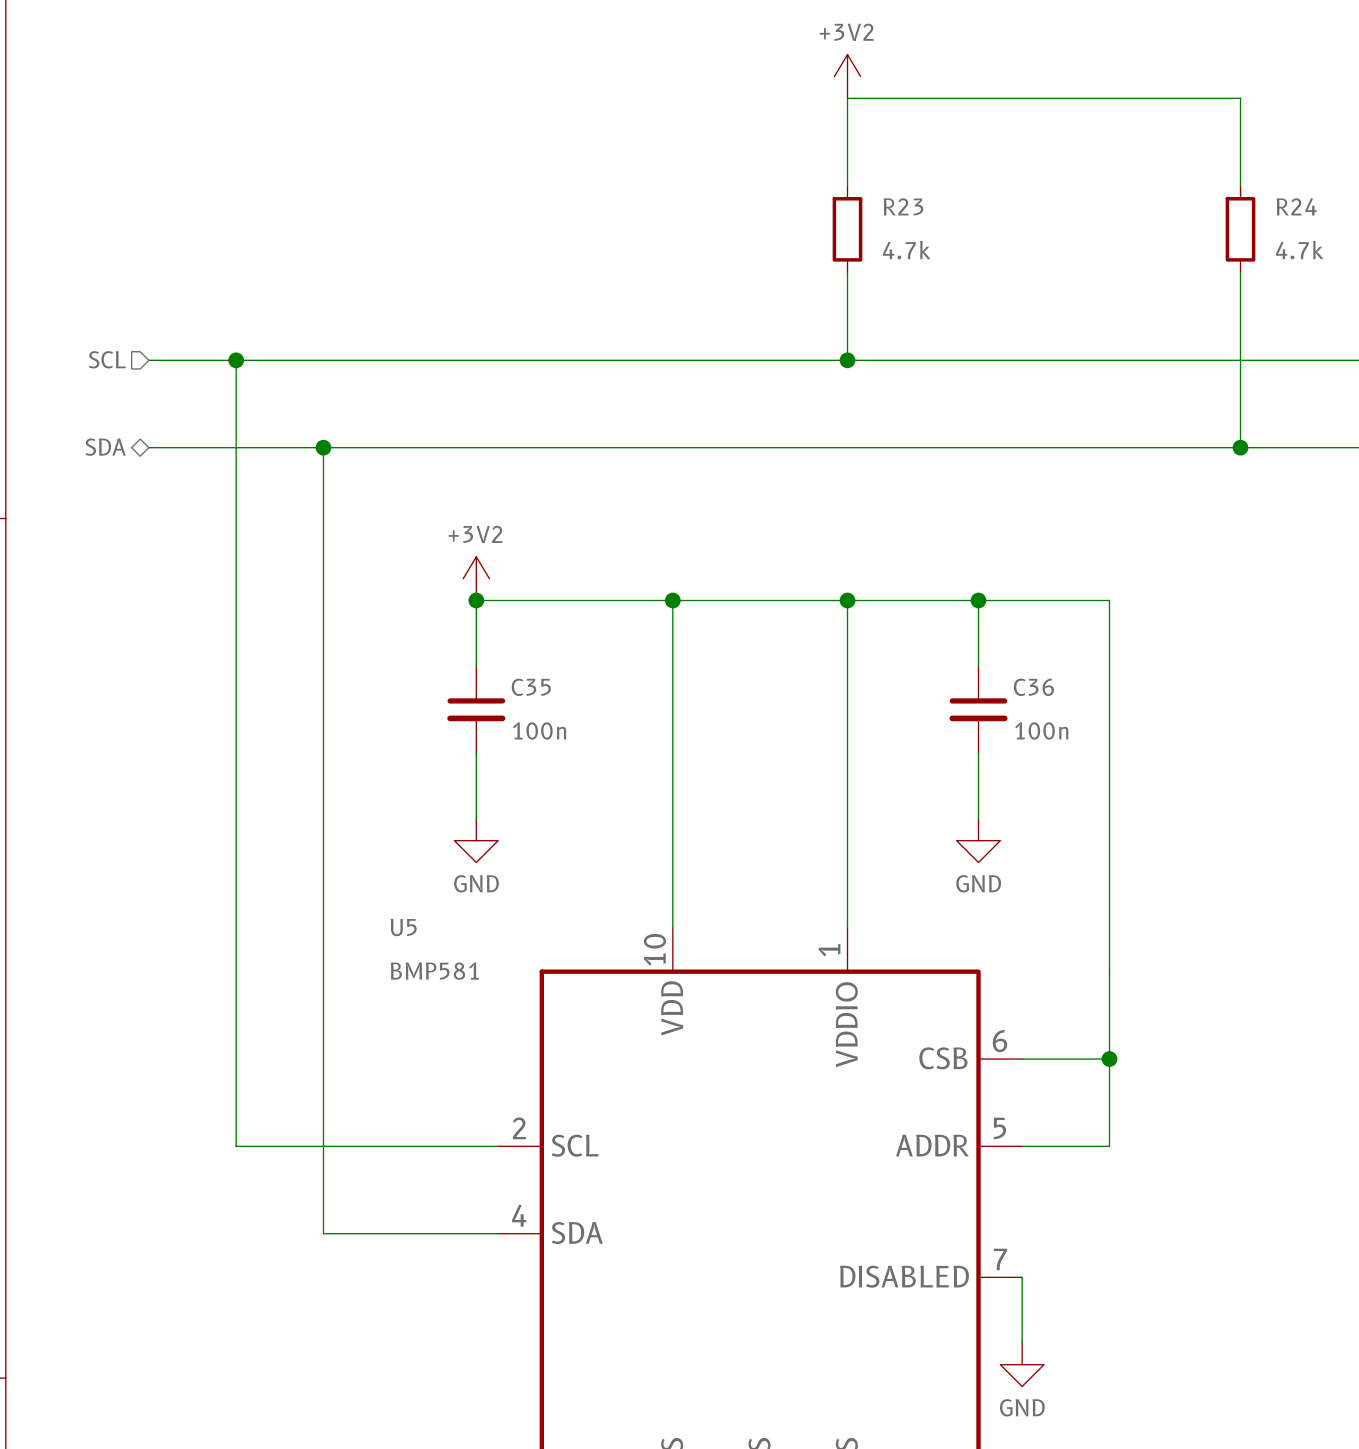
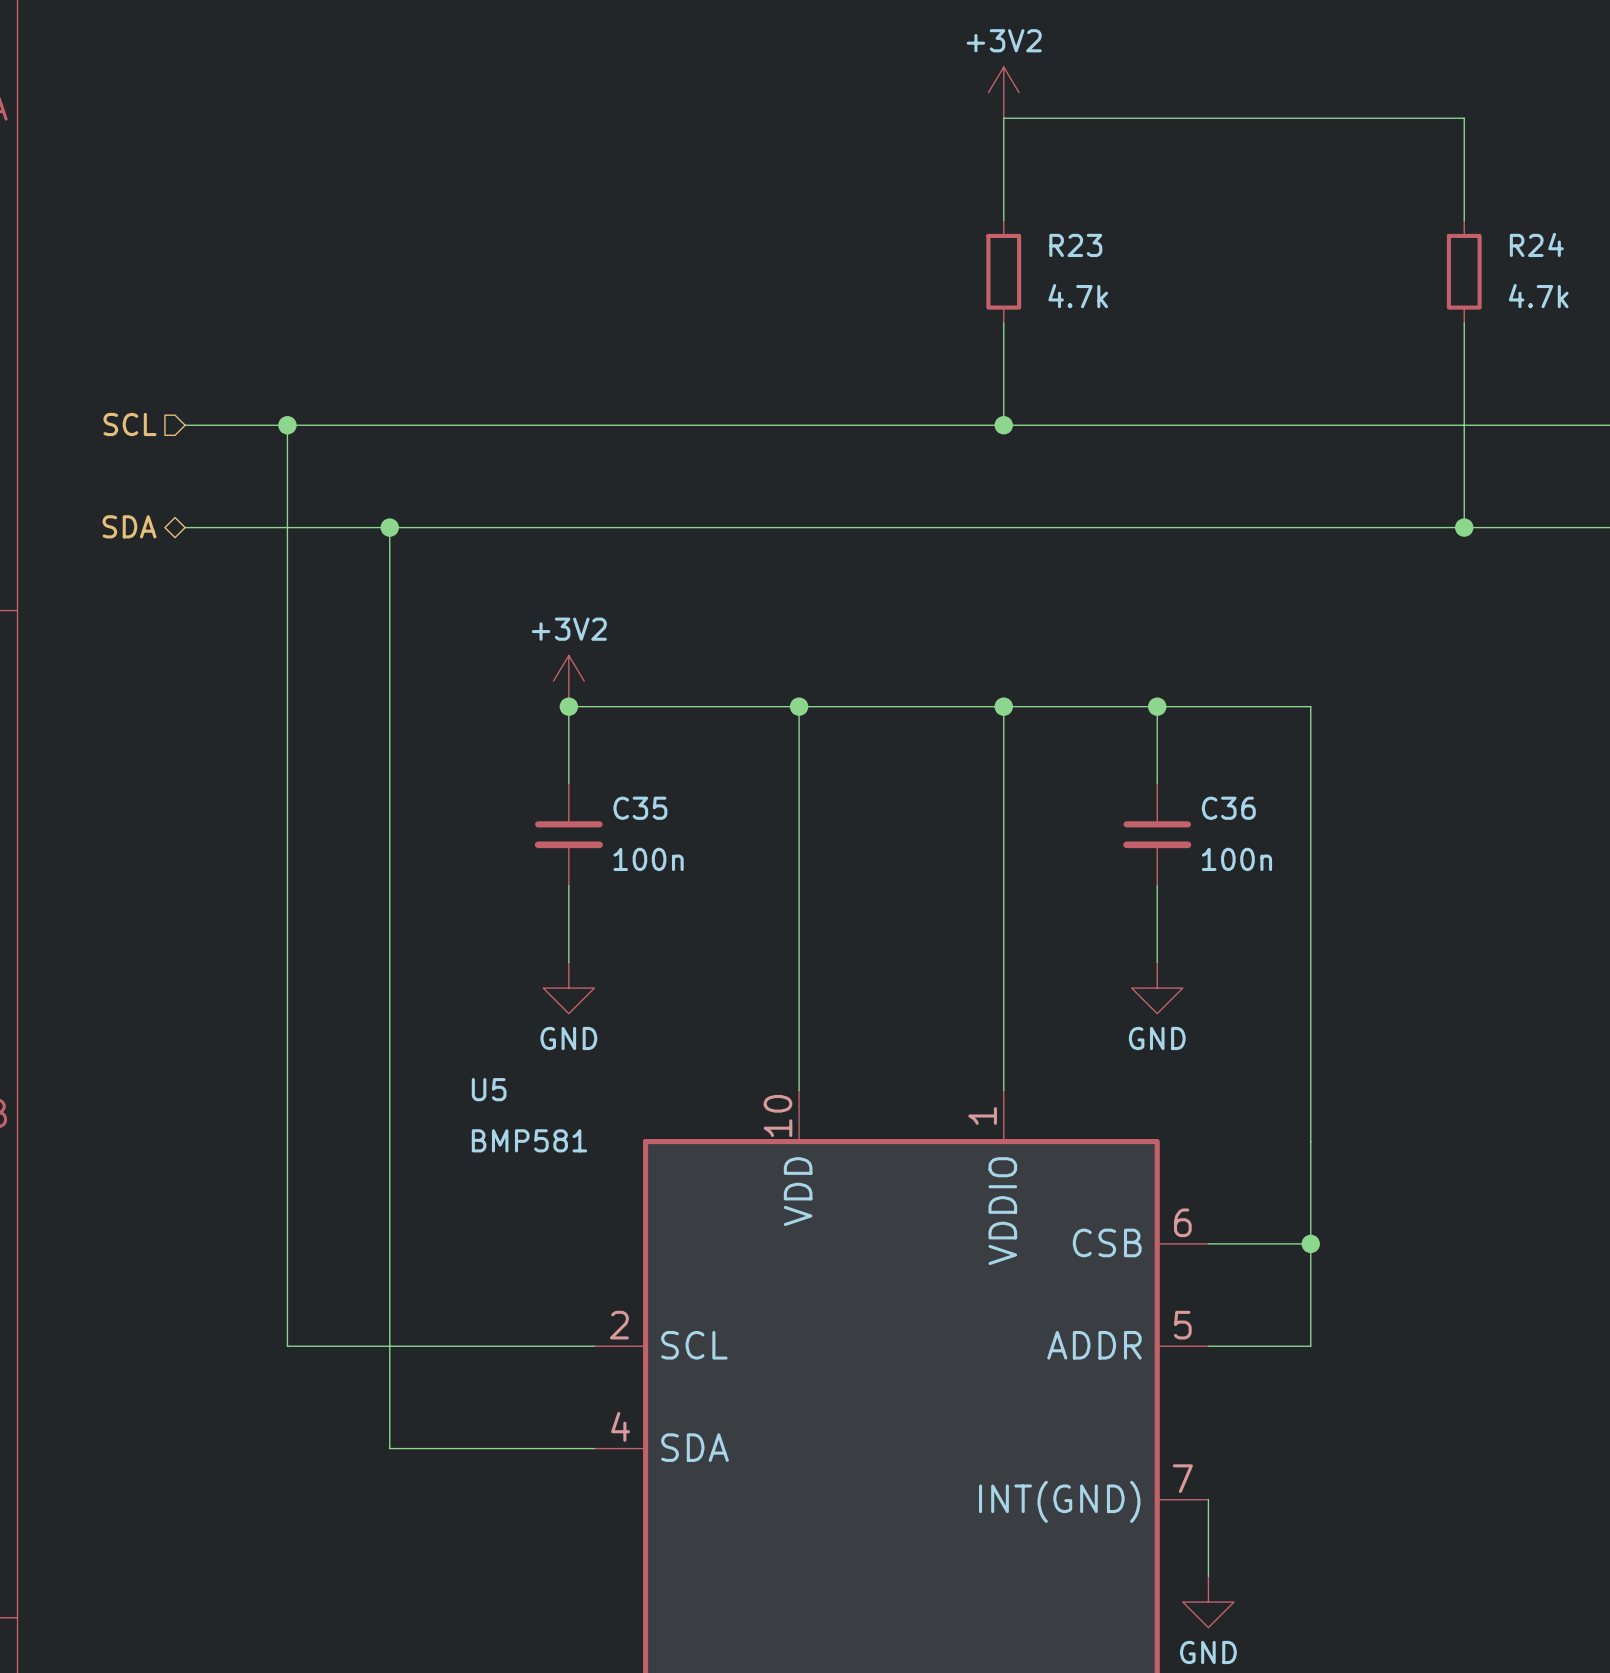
U5 pin name: DISABLED (904, 1276) -> INT(GND) (1059, 1501)

